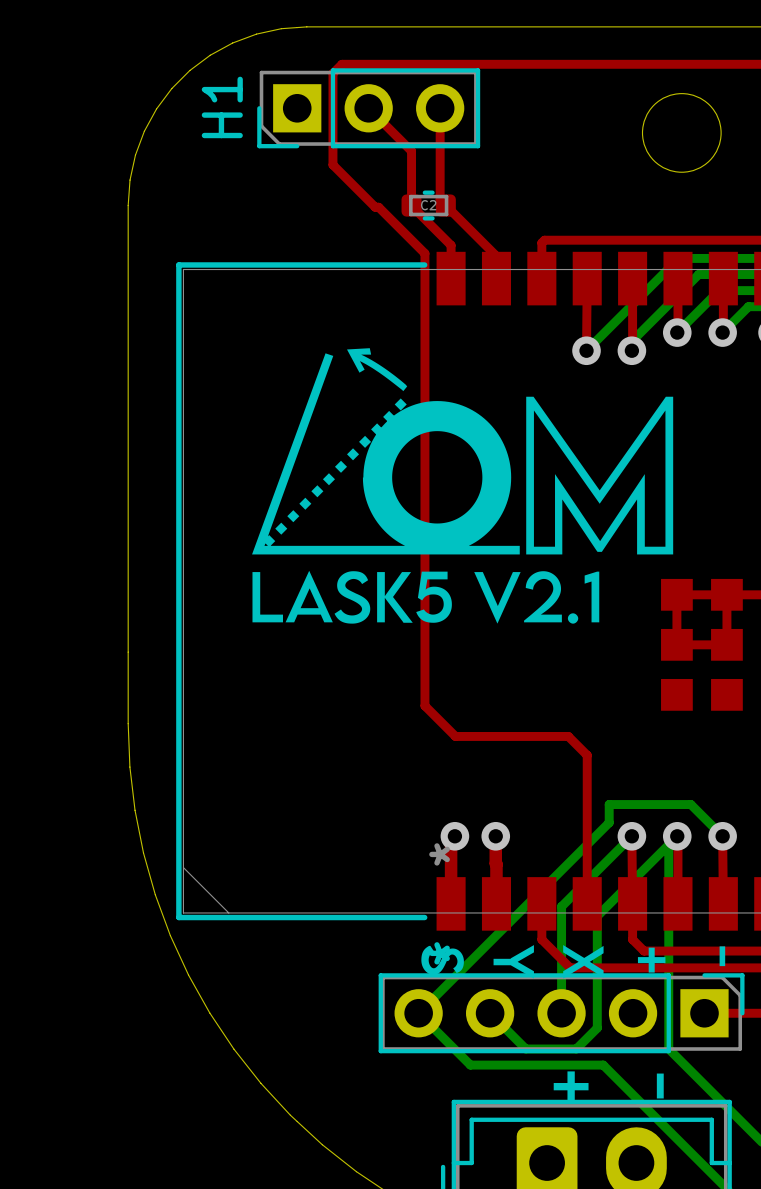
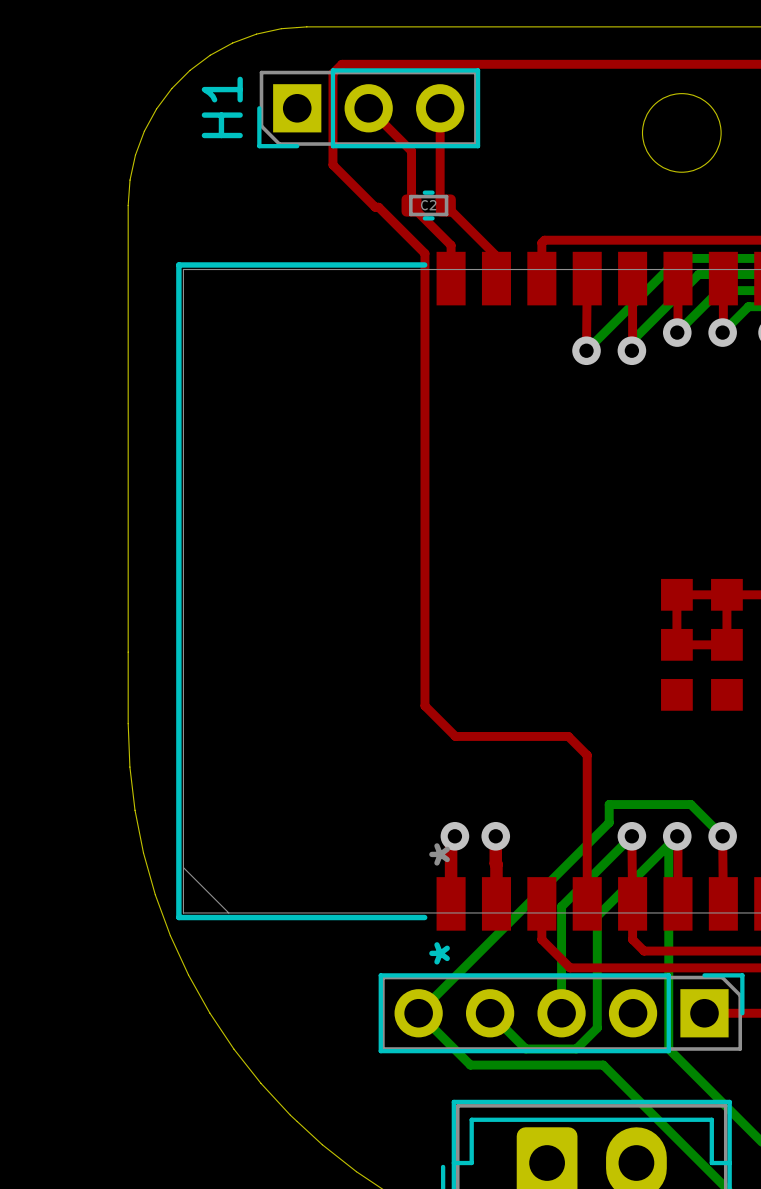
drawing: [252, 348, 674, 624] -> none
drawing: [421, 945, 666, 979] -> none
drawing: [719, 946, 726, 967] -> none
drawing: [553, 1071, 589, 1102] -> none
drawing: [656, 1073, 664, 1099] -> none

